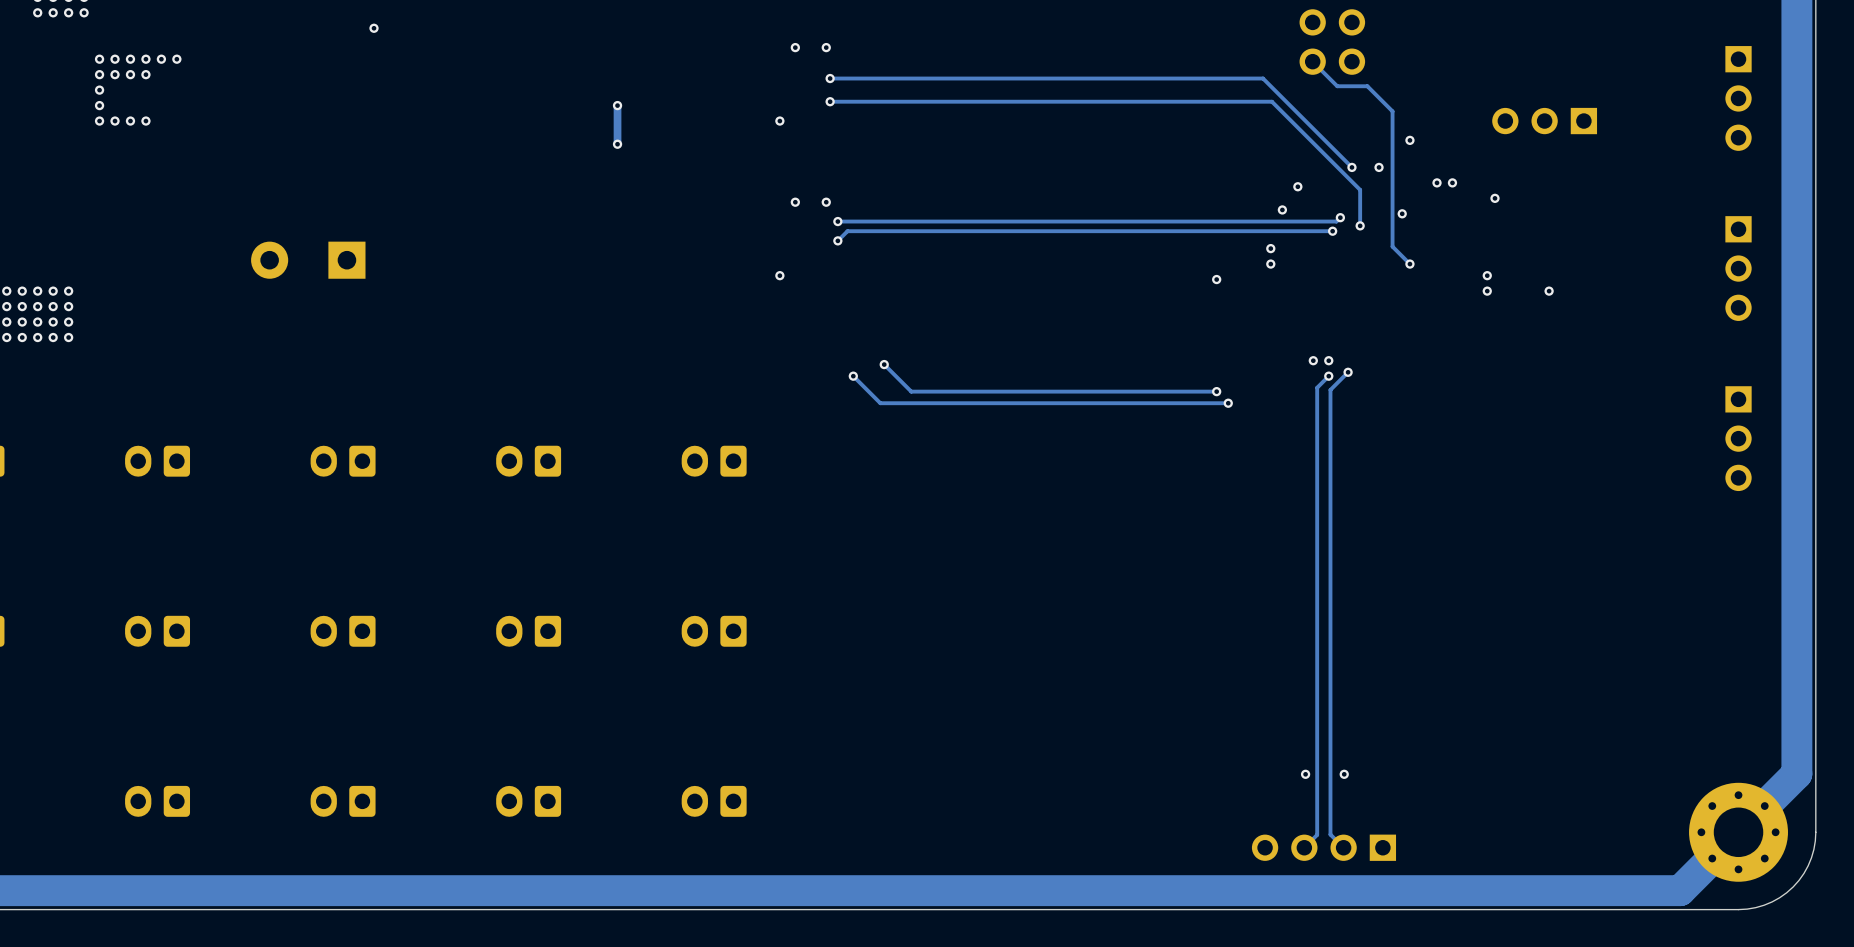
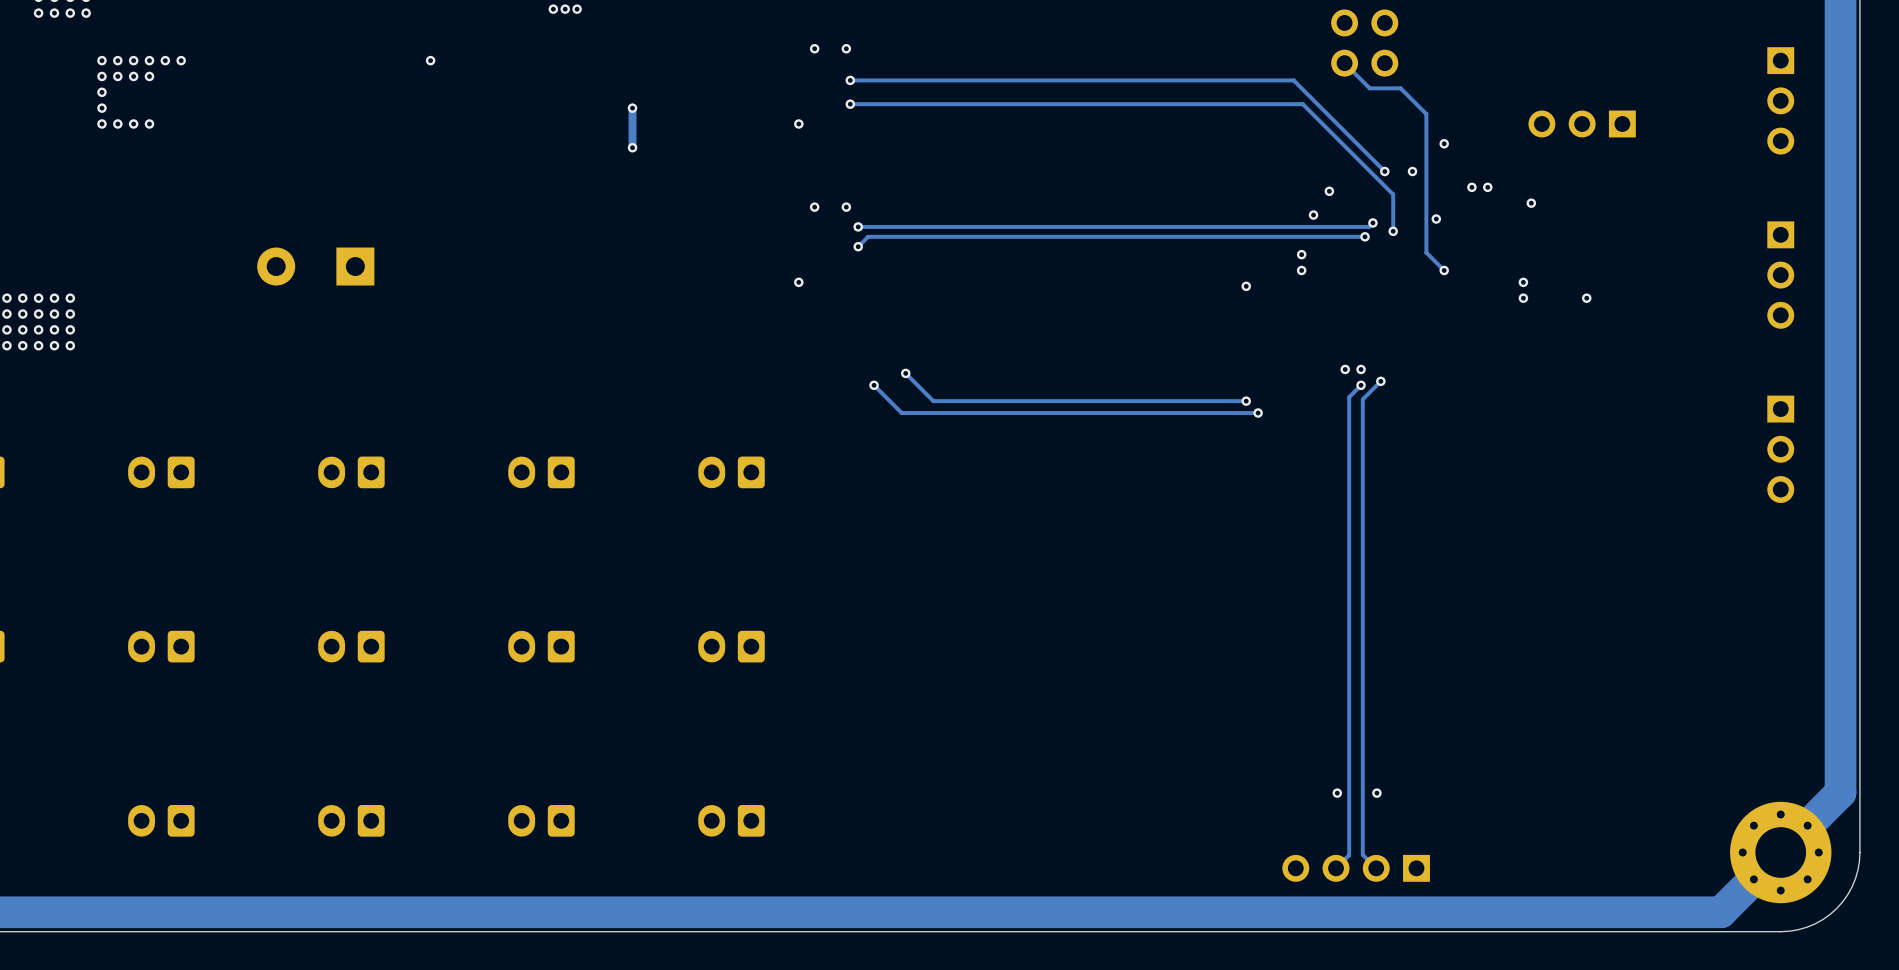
via: none -> (553, 9)
via: none -> (565, 9)
via: none -> (577, 9)
via position: (374, 28) -> (430, 60)

